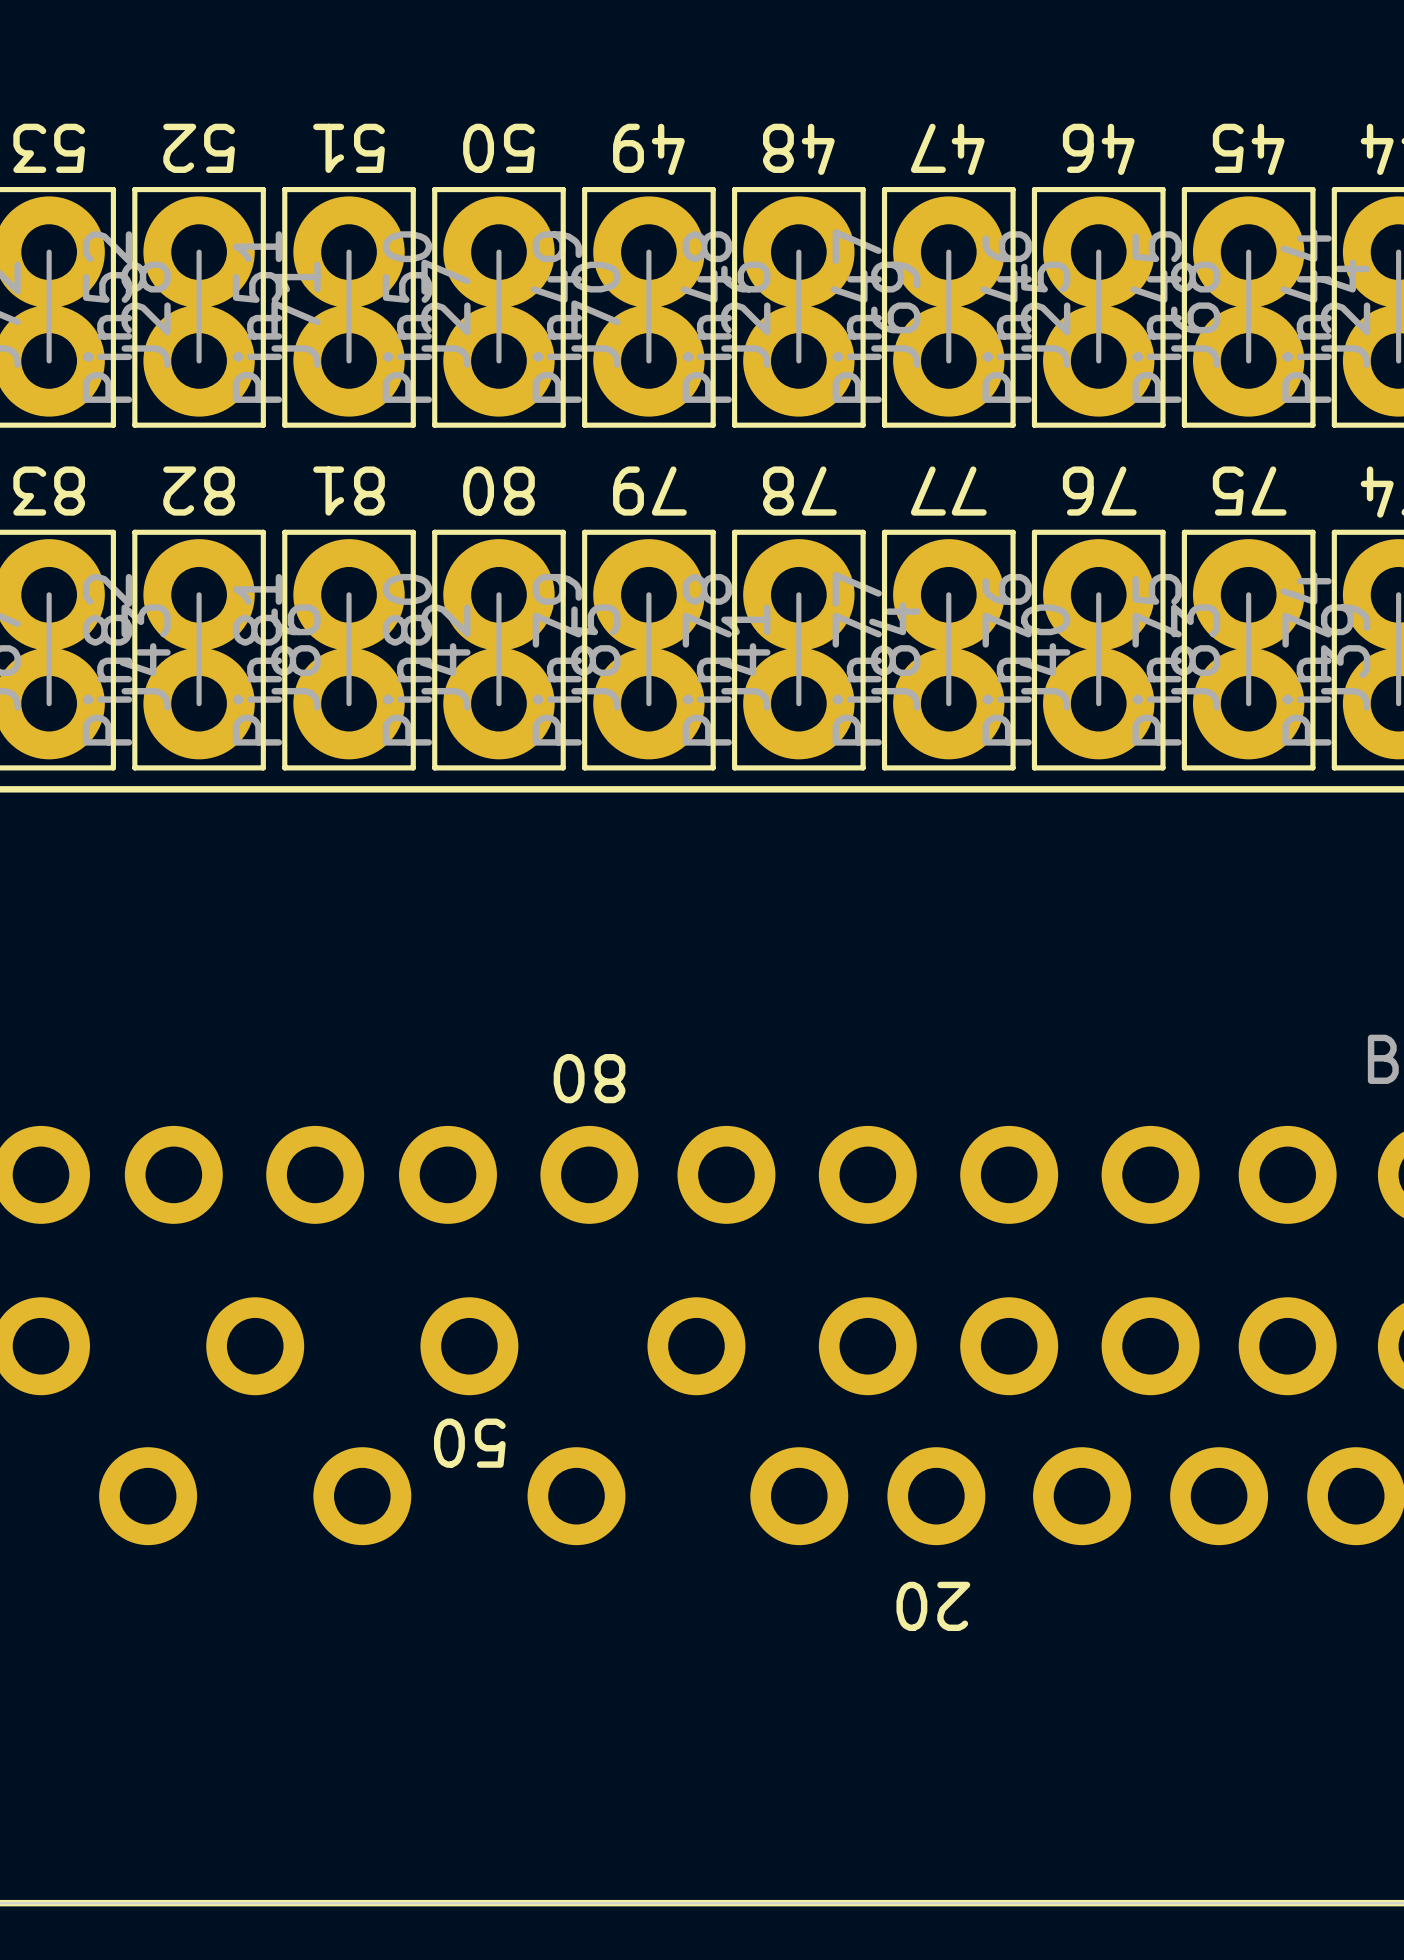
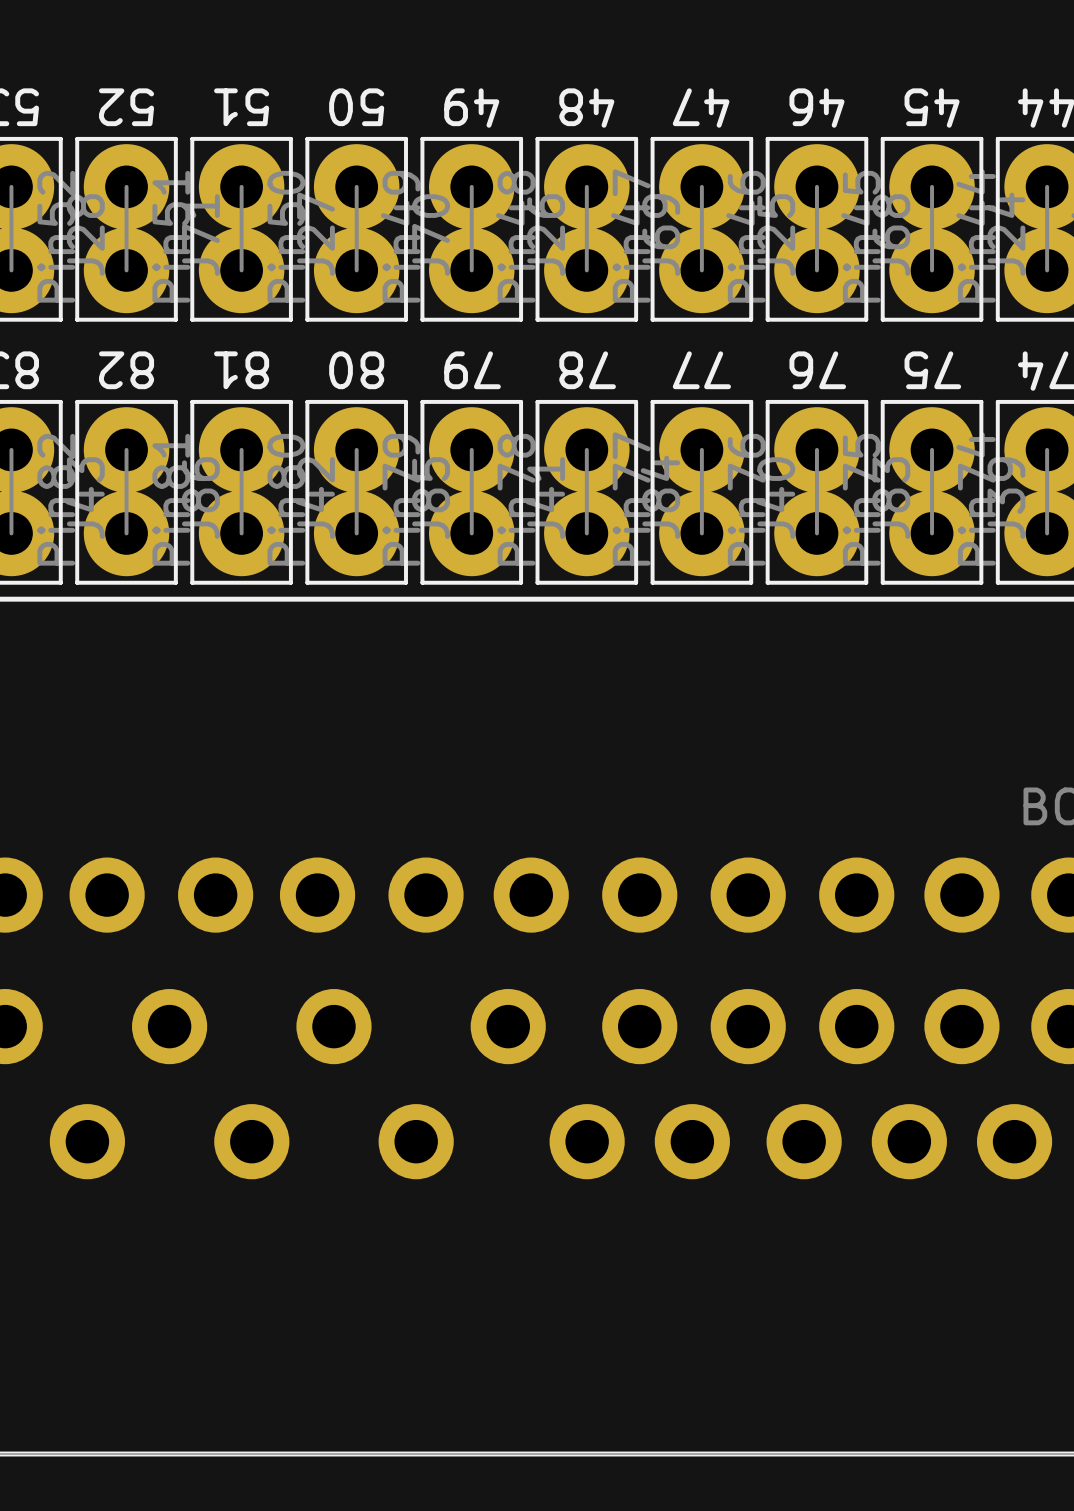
text: 80 (589, 1078) -> none
text: 50 (469, 1443) -> none
text: 20 (933, 1606) -> none

